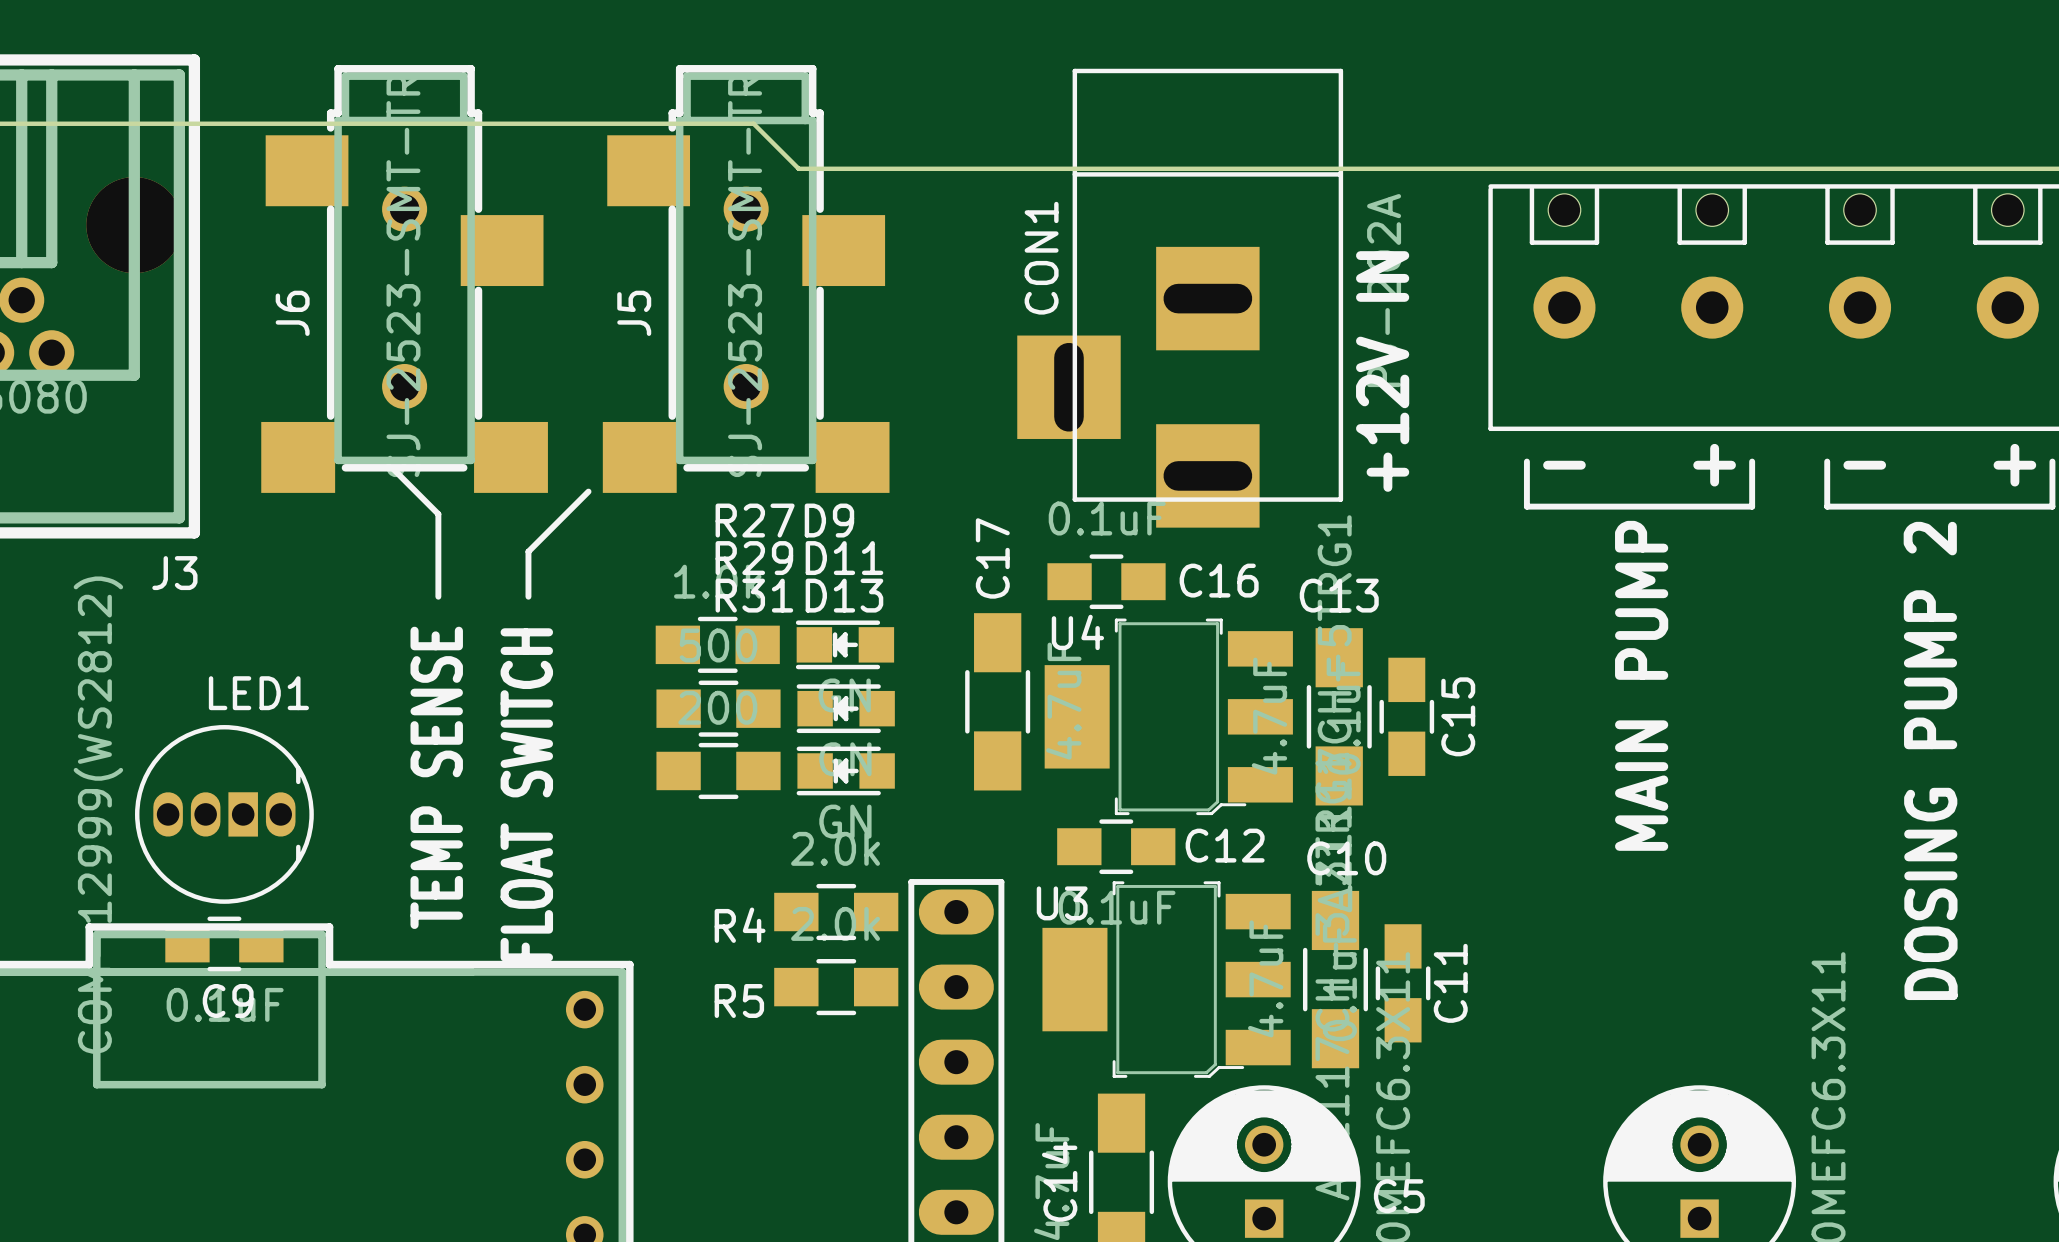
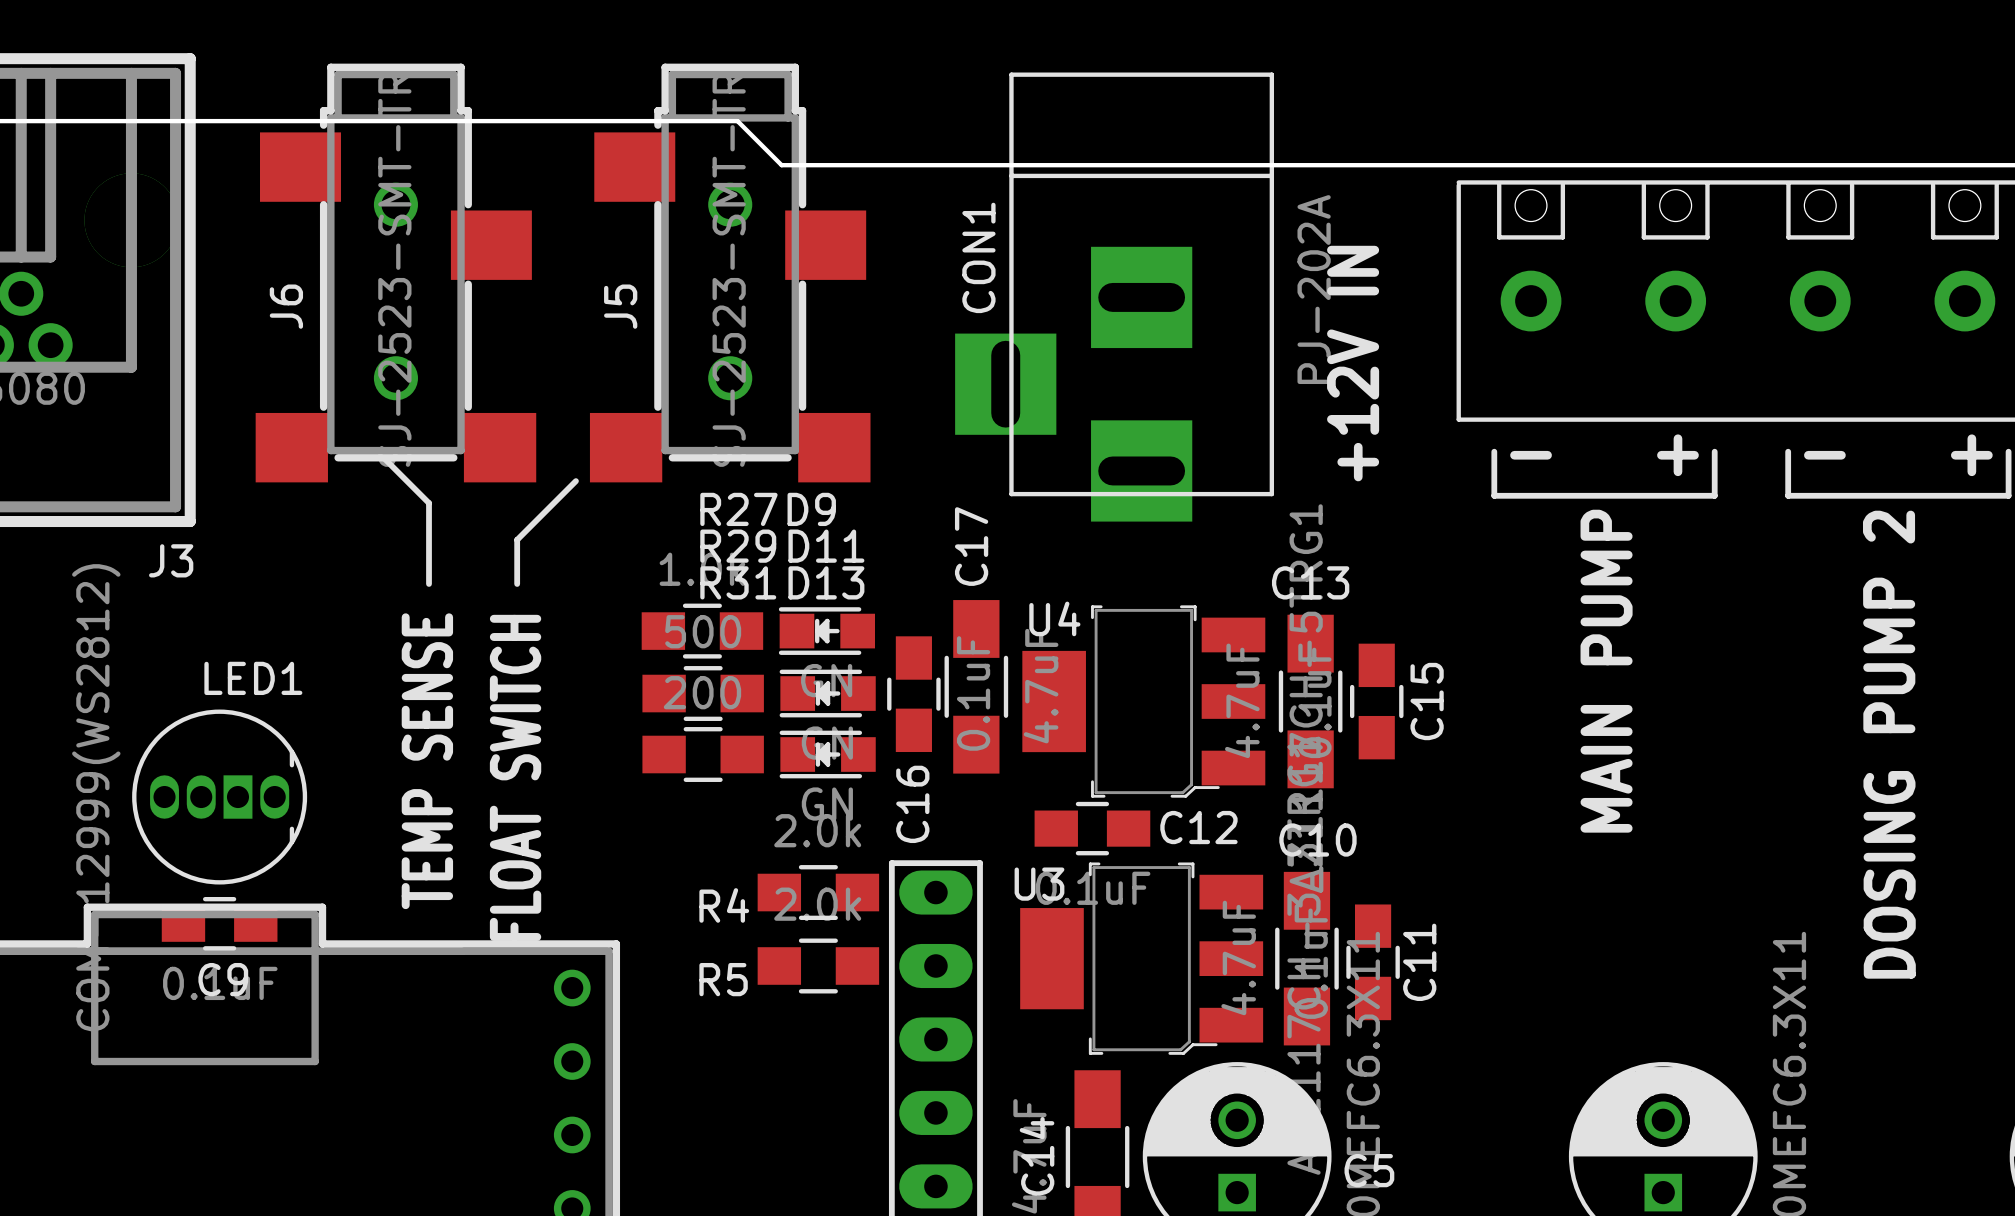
CON1 position: (1180, 298) -> (1114, 297)
C16 rotation: 0° (1106, 581) -> 90° clockwise (913, 694)
C16 position: (1106, 581) -> (913, 694)

